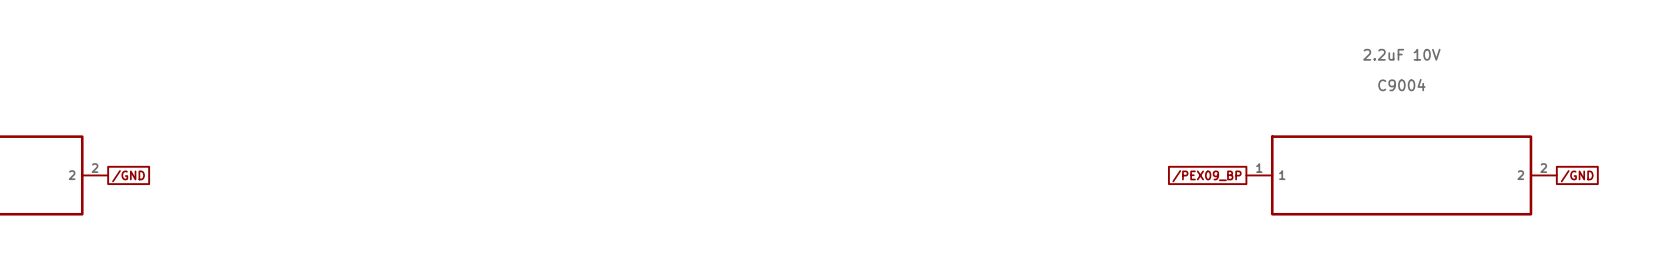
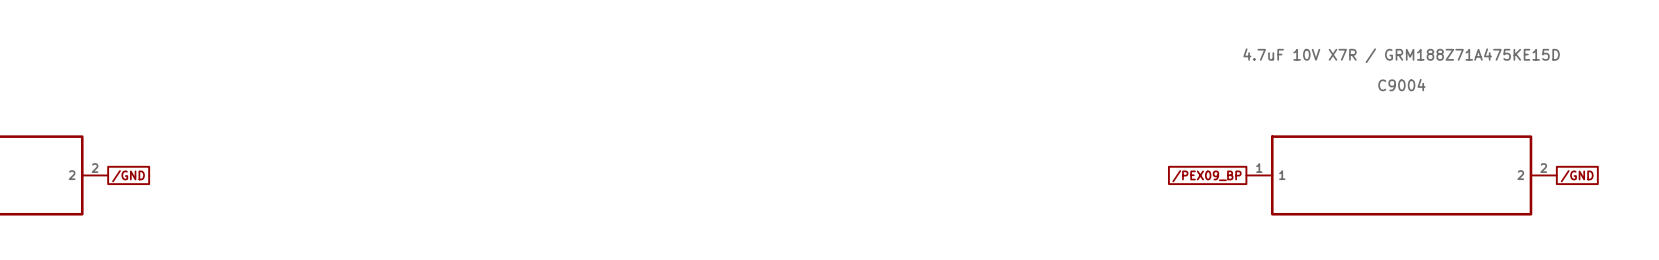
C9004 value: 2.2uF 10V (1401, 54) -> 4.7uF 10V X7R / GRM188Z71A475KE15D (1401, 55)

